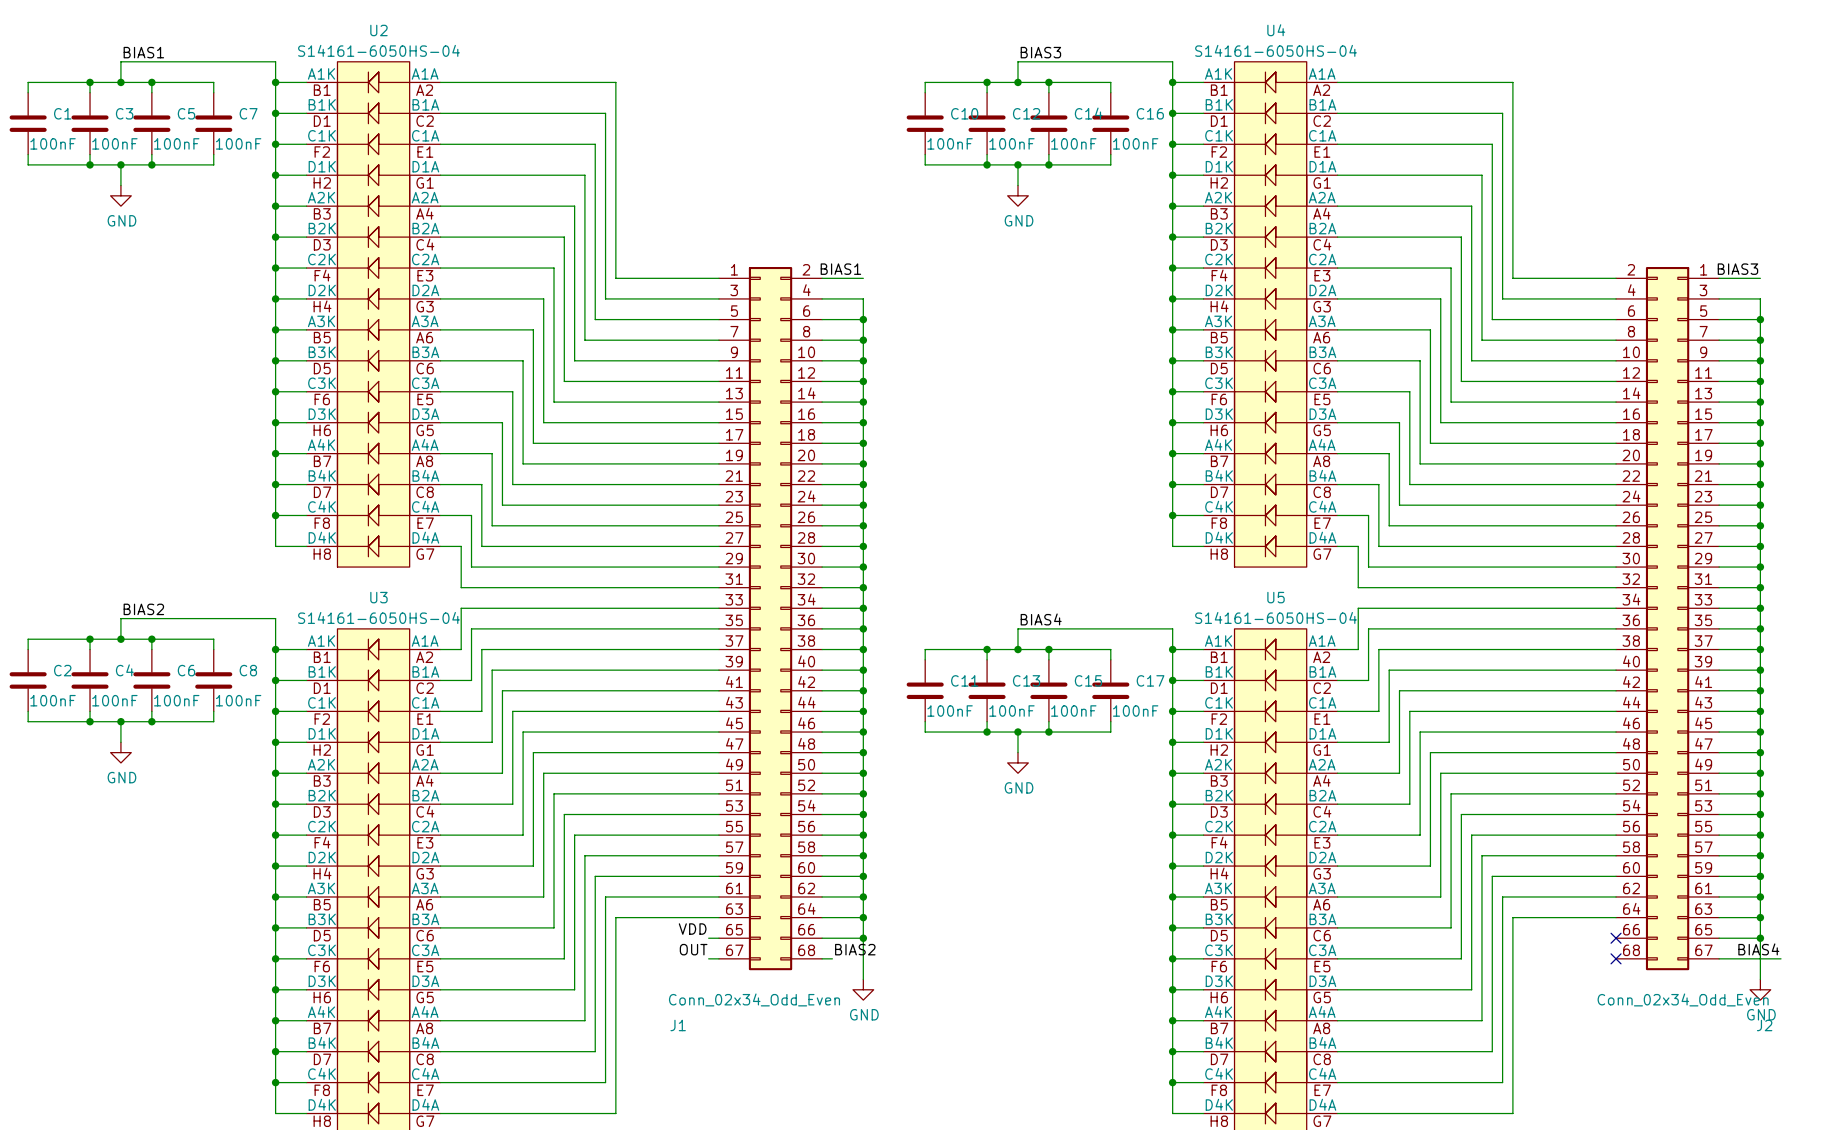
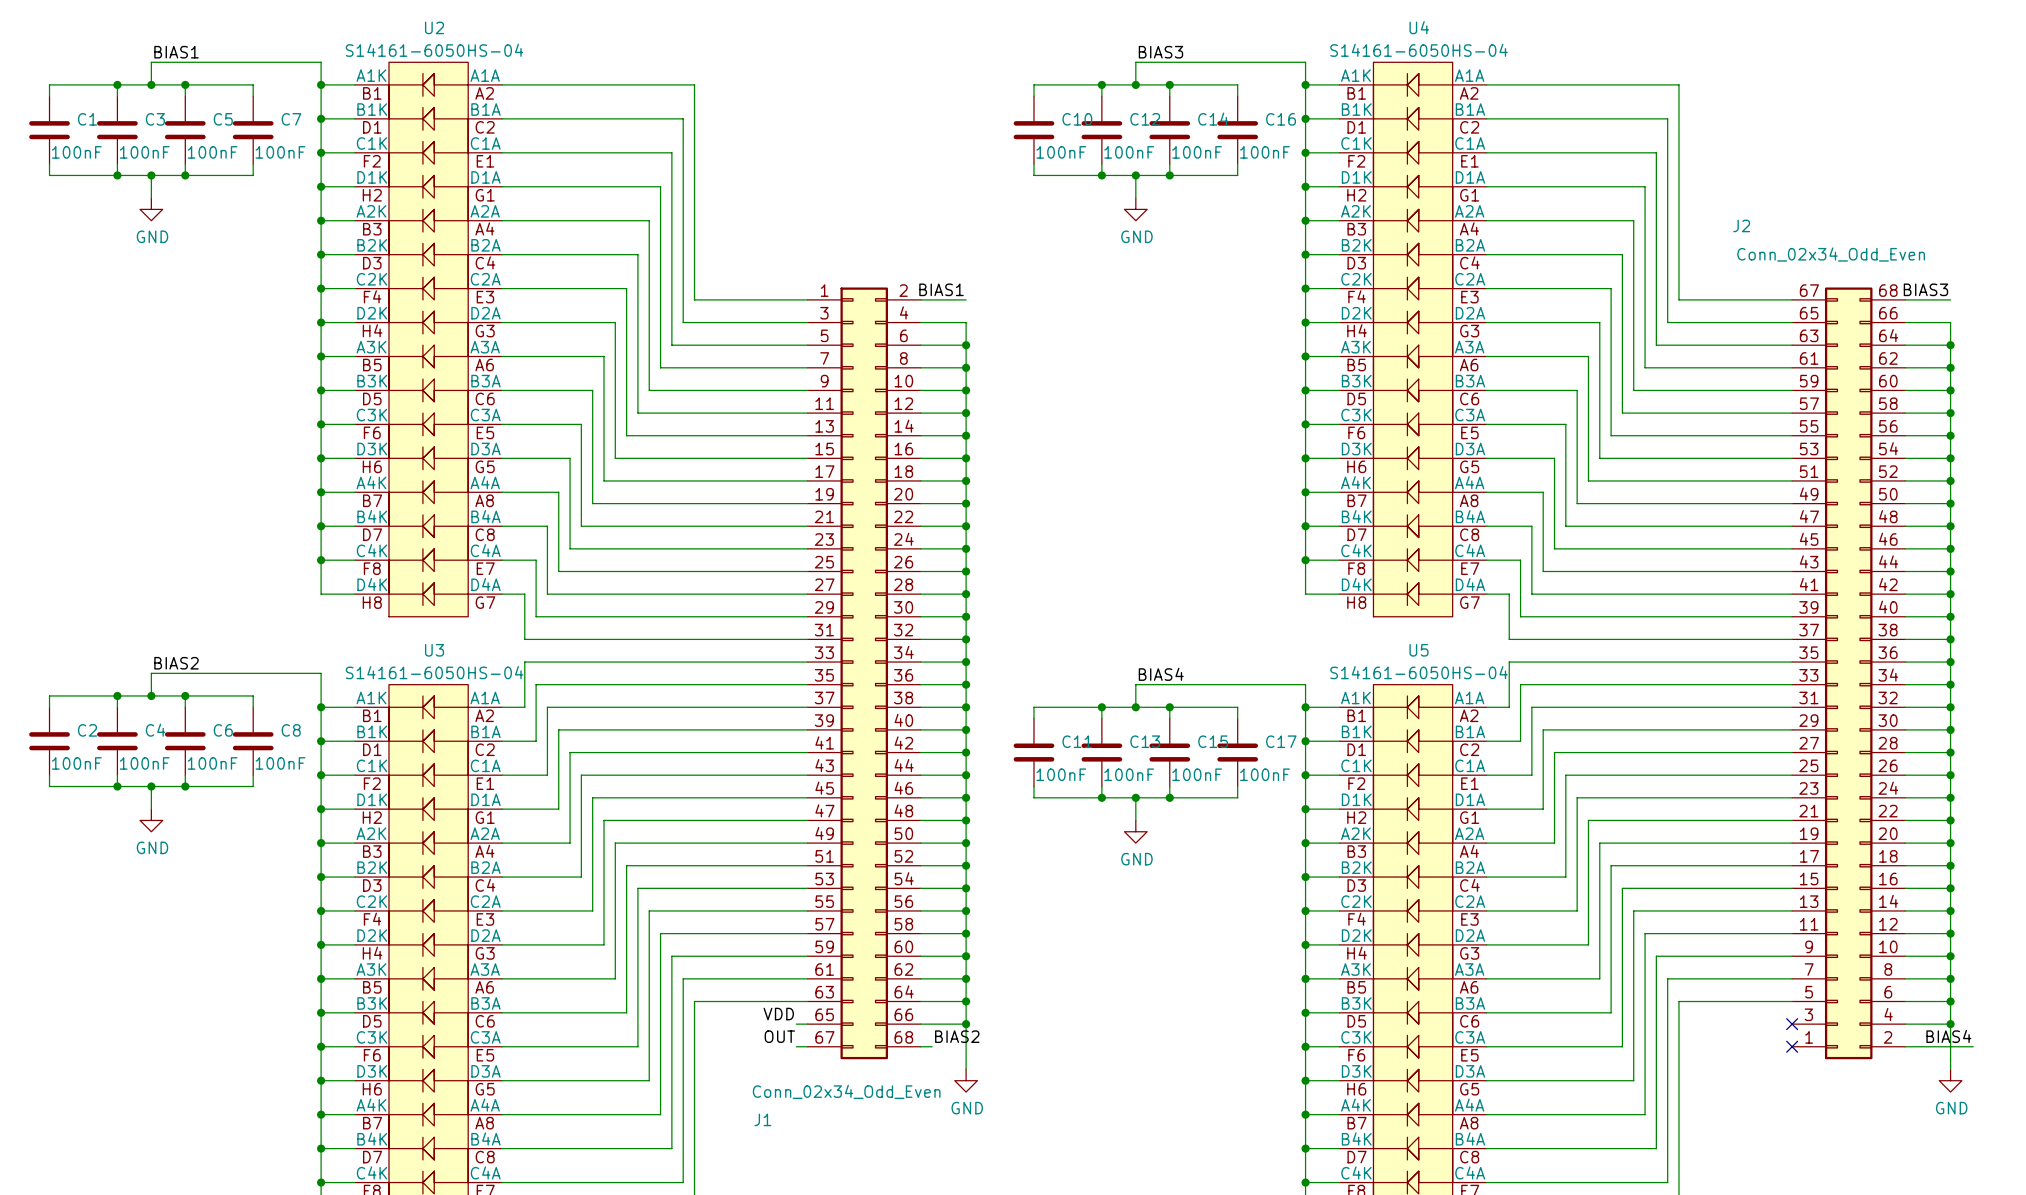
J2 rotation: 0° (1667, 618) -> 180° (1848, 673)

